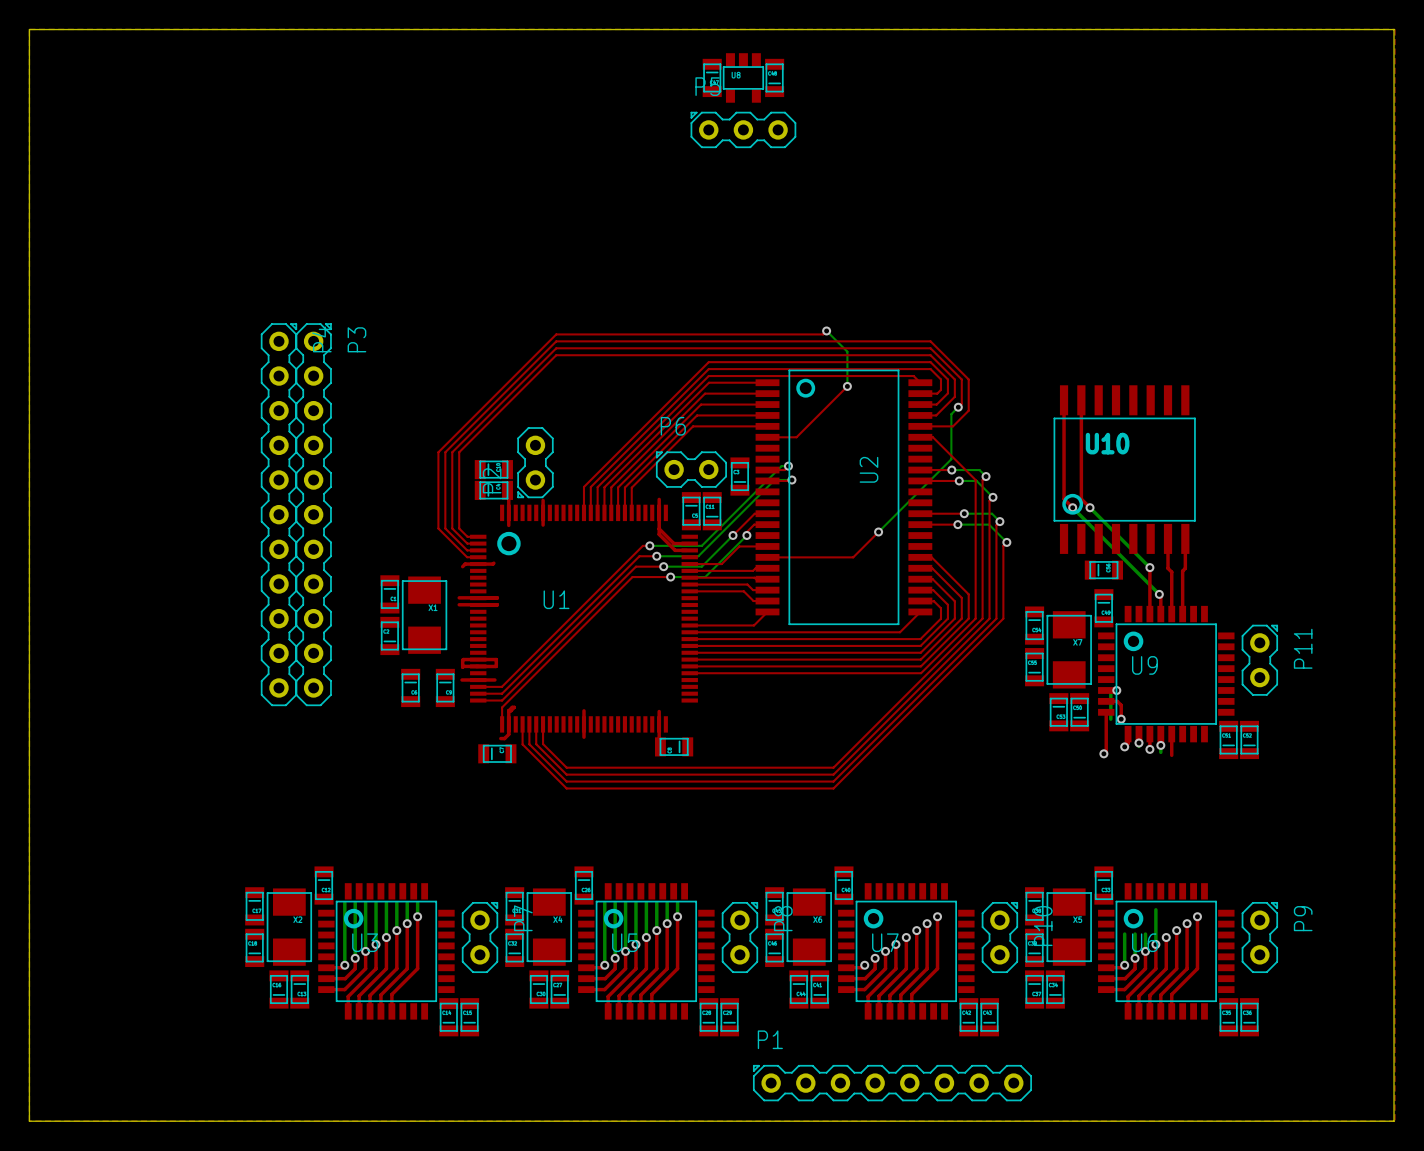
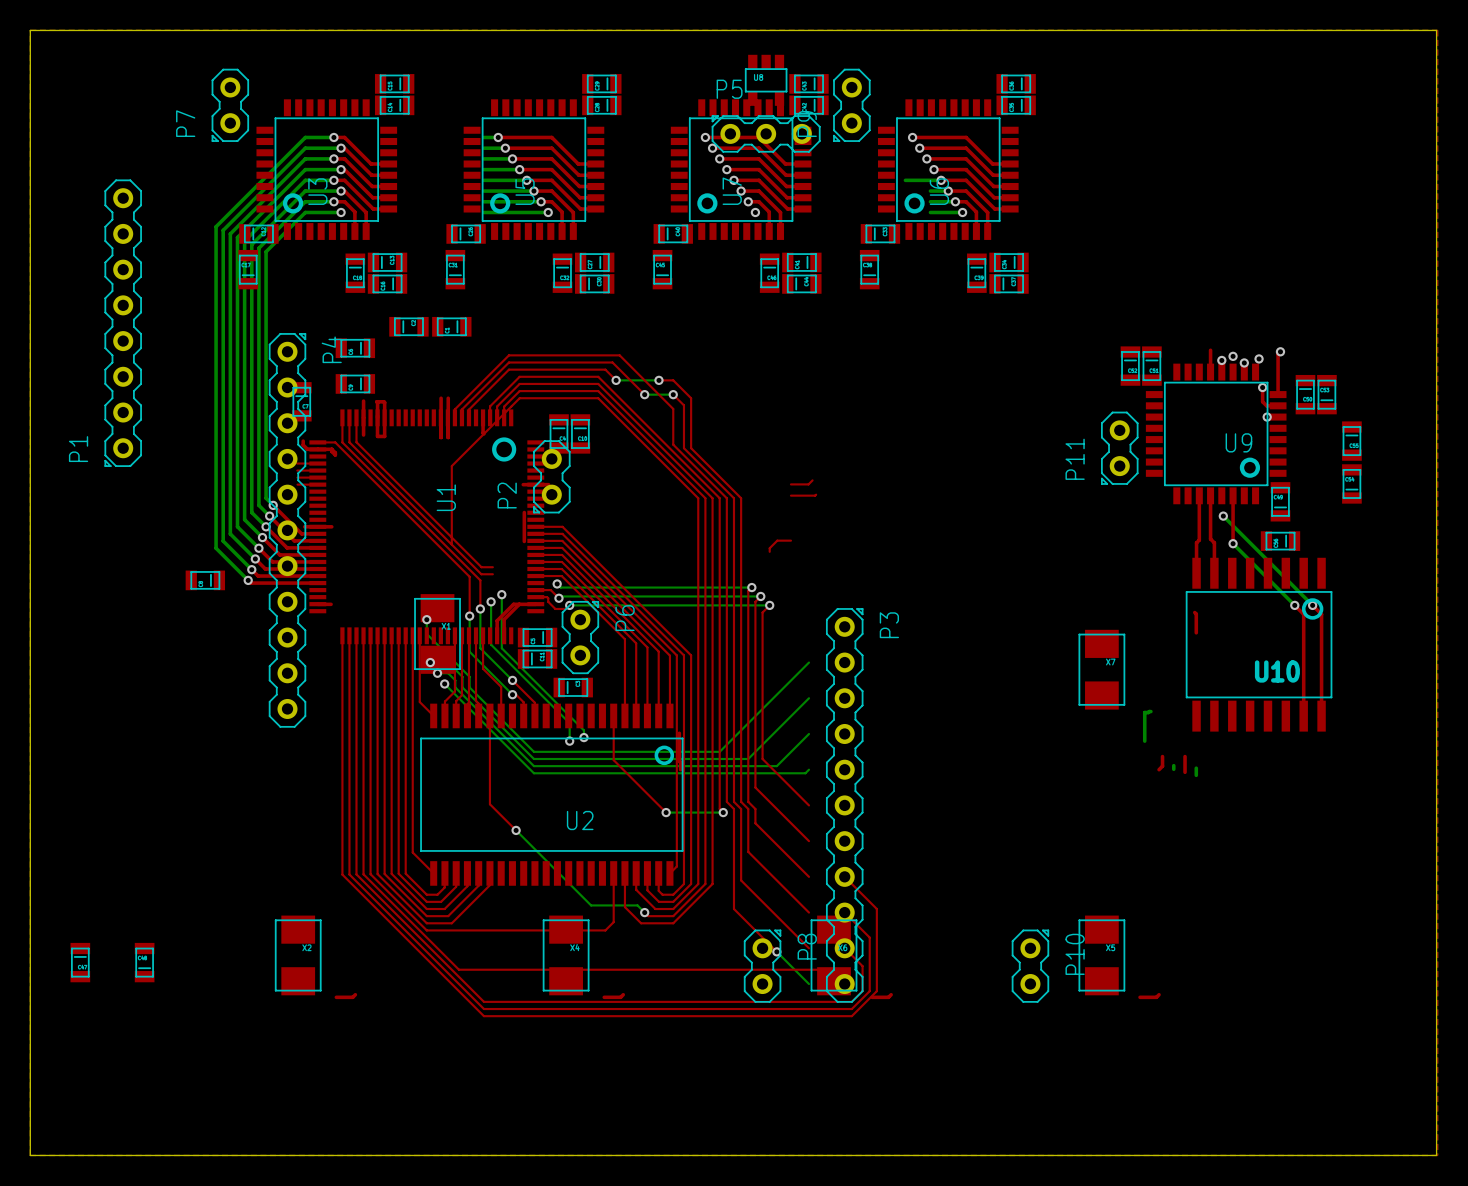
part position: (712, 77) -> (80, 962)
part position: (774, 77) -> (144, 962)
top track: none -> (333, 137) (344, 137) (371, 164) (388, 164)
bottom track: none -> (333, 137) (305, 137) (216, 226) (216, 548) (248, 580)
via: none -> (333, 137)
bottom track: none -> (483, 137) (498, 137)
top track: none -> (498, 137) (551, 137) (578, 164) (595, 164)
via: none -> (498, 137)
top track: none -> (705, 137) (758, 137) (785, 164) (803, 164)
via: none -> (705, 137)
top track: none -> (912, 137) (966, 137) (992, 164) (1010, 164)
via: none -> (912, 137)
top track: none -> (341, 148) (344, 148) (371, 175) (388, 175)
bottom track: none -> (341, 148) (305, 148) (223, 230) (223, 541) (251, 569)
via: none -> (341, 148)
bottom track: none -> (483, 148) (505, 148)
top track: none -> (505, 148) (551, 148) (578, 175) (595, 175)
via: none -> (505, 148)
top track: none -> (712, 148) (758, 148) (786, 175) (803, 175)
via: none -> (712, 148)
top track: none -> (919, 148) (966, 148) (993, 175) (1010, 175)
via: none -> (919, 148)
top track: none -> (333, 158) (344, 158) (372, 186) (388, 186)
bottom track: none -> (333, 158) (305, 158) (230, 233) (230, 533) (255, 558)
via: none -> (333, 158)
bottom track: none -> (483, 158) (512, 158)
top track: none -> (512, 158) (551, 158) (579, 186) (595, 186)
via: none -> (512, 158)
top track: none -> (719, 158) (758, 158) (786, 186) (803, 186)
via: none -> (719, 158)
top track: none -> (926, 158) (966, 158) (993, 186) (1010, 186)
via: none -> (926, 158)
top track: none -> (341, 169) (344, 169) (372, 197) (388, 197)
bottom track: none -> (341, 169) (305, 169) (237, 237) (237, 526) (258, 548)
via: none -> (341, 169)
bottom track: none -> (483, 169) (519, 169)
top track: none -> (519, 169) (551, 169) (579, 197) (595, 197)
via: none -> (519, 169)
top track: none -> (726, 169) (758, 169) (787, 197) (803, 197)
via: none -> (726, 169)
top track: none -> (934, 169) (966, 169) (994, 197) (1010, 197)
via: none -> (934, 169)
top track: none -> (333, 180) (344, 180) (373, 209) (388, 209)
bottom track: none -> (333, 180) (305, 180) (244, 241) (244, 519) (262, 537)
via: none -> (333, 180)
bottom track: none -> (483, 180) (526, 180)
top track: none -> (526, 180) (551, 180) (580, 209) (595, 209)
via: none -> (526, 180)
top track: none -> (733, 180) (758, 180) (787, 209) (803, 209)
via: none -> (733, 180)
bottom track: none -> (905, 180) (941, 180)
top track: none -> (941, 180) (966, 180) (994, 209) (1010, 209)
via: none -> (941, 180)
top track: none -> (341, 191) (344, 191) (366, 212) (366, 231)
bottom track: none -> (341, 191) (305, 191) (251, 244) (251, 512) (266, 526)
via: none -> (341, 191)
bottom track: none -> (483, 191) (533, 191)
top track: none -> (533, 191) (551, 191) (573, 212) (573, 231)
via: none -> (533, 191)
top track: none -> (741, 191) (758, 191) (780, 212) (780, 231)
via: none -> (741, 191)
bottom track: none -> (930, 191) (948, 191)
top track: none -> (948, 191) (966, 191) (987, 212) (987, 231)
via: none -> (948, 191)
top track: none -> (333, 201) (344, 201) (354, 212) (354, 231)
bottom track: none -> (333, 201) (305, 201) (258, 248) (258, 505) (269, 516)
via: none -> (333, 201)
bottom track: none -> (483, 201) (541, 201)
top track: none -> (541, 201) (551, 201) (562, 212) (562, 231)
via: none -> (541, 201)
top track: none -> (748, 201) (758, 201) (769, 212) (769, 231)
via: none -> (748, 201)
bottom track: none -> (930, 201) (955, 201)
top track: none -> (955, 201) (966, 201) (976, 212) (976, 231)
via: none -> (955, 201)
bottom track: none -> (341, 212) (305, 212) (266, 251) (266, 498) (273, 505)
via: none -> (341, 212)
bottom track: none -> (483, 212) (548, 212)
via: none -> (548, 212)
via: none -> (755, 212)
bottom track: none -> (930, 212) (962, 212)
via: none -> (962, 212)
top track: (826, 330) (823, 334) (556, 334) (504, 386) -> (636, 873) (636, 889) (655, 909) (673, 909) (698, 884) (698, 498) (598, 398) (519, 398)
bottom track: (826, 330) (847, 351) (847, 386) -> none
via: (826, 330) -> none
top track: none -> (1210, 350) (1210, 372)
top track: none -> (1280, 351) (1278, 354) (1278, 394)
via: none -> (1280, 351)
via: none -> (1233, 356)
via: none -> (1259, 358)
via: none -> (1221, 360)
via: none -> (1244, 362)
top track: none -> (616, 380) (605, 369) (508, 369) (468, 409) (468, 417)
bottom track: none -> (616, 380) (658, 380)
via: none -> (616, 380)
top track: none -> (658, 380) (673, 380) (691, 398) (691, 448) (741, 498) (741, 801) (748, 808) (748, 851) (808, 912)
via: none -> (658, 380)
top track: none -> (1262, 387) (1262, 401) (1266, 405) (1278, 405)
via: none -> (1262, 387)
top track: none -> (644, 394) (612, 362) (508, 362) (461, 409) (461, 417)
bottom track: none -> (644, 394) (673, 394)
via: none -> (644, 394)
top track: none -> (673, 394) (683, 405) (683, 448) (733, 498) (733, 801) (741, 808) (741, 880) (808, 948)
via: none -> (673, 394)
top track: (767, 382) (709, 382) (604, 487) (604, 512) -> none
top track: (920, 382) (913, 376) (708, 376) (597, 487) (597, 512) -> none
top track: none -> (441, 398) (441, 437) (440, 417)
top track: none -> (448, 398) (448, 437) (447, 417)
top track: (847, 386) (796, 437) (767, 437) -> none
via: (847, 386) -> none
top track: none -> (363, 401) (363, 435)
top track: none -> (376, 401) (377, 436) (384, 436) (384, 402) (376, 401)
top track: (767, 393) (705, 393) (611, 487) (611, 512) -> none
top track: (920, 393) (937, 393) (940, 389) (940, 379) (930, 369) (708, 369) (590, 487) (590, 512) -> none
top track: (1064, 400) (1064, 499) (1072, 507) -> none
top track: (1081, 400) (1081, 499) (1090, 507) -> none
top track: (767, 404) (701, 404) (618, 487) (618, 512) -> none
top track: (920, 404) (936, 404) (947, 393) (947, 379) (930, 362) (708, 362) (583, 486) (583, 512) -> none
via: none -> (1267, 417)
top track: none -> (342, 417) (342, 442) (480, 580) (480, 608)
top track: none -> (349, 417) (349, 442) (451, 544)
top track: none -> (454, 417) (454, 409) (508, 355) (619, 355) (673, 408) (673, 444) (726, 498) (726, 801) (733, 808) (733, 909) (776, 951)
top track: none -> (483, 417) (483, 433)
top track: none -> (490, 417) (490, 406) (519, 376) (598, 376) (719, 498) (719, 808) (723, 812)
top track: none -> (497, 417) (497, 406) (519, 383) (598, 383) (712, 498) (712, 884) (673, 923) (641, 923) (624, 907) (624, 873)
top track: none -> (504, 417) (504, 406) (519, 391) (598, 391) (705, 498) (705, 884) (673, 916) (648, 916) (644, 912)
top track: (958, 407) (961, 403) (961, 379) (930, 348) (556, 348) (452, 452) (452, 528) (467, 543) (478, 543) -> none
bottom track: (958, 407) (951, 414) (951, 459) (878, 532) -> none
via: (958, 407) -> none
top track: (767, 415) (697, 415) (624, 487) (624, 512) -> none
top track: (920, 415) (936, 415) (954, 396) (954, 379) (930, 355) (556, 355) (459, 452) (459, 528) (467, 536) (478, 536) -> none
top track: (767, 426) (693, 426) (631, 487) (631, 512) -> none
top track: (920, 426) (953, 426) (968, 410) (968, 379) (930, 341) (556, 341) (445, 452) (445, 528) -> (356, 417) (356, 442) (458, 544)
top track: none -> (303, 441) (303, 445) (307, 449) (331, 449)
top track: none -> (317, 442) (335, 442) (469, 576) (469, 616)
top track: none -> (331, 449) (335, 452) (335, 455) (331, 451) (331, 449)
top track: (920, 437) (932, 437) (975, 480) (975, 618) (921, 673) (689, 673) -> none
top track: none -> (297, 463) (317, 463)
top track: none -> (297, 470) (317, 470)
top track: none -> (297, 477) (317, 477)
bottom track: (788, 466) (781, 466) (701, 545) (649, 545) -> none
via: (788, 466) -> none
part rotation: 0° (493, 469) -> 90° clockwise (580, 433)
part position: (493, 469) -> (580, 433)
P6 rotation: 0° (691, 469) -> 90° clockwise (580, 637)
P6 position: (691, 469) -> (580, 637)
U10 rotation: 0° (1124, 469) -> 180° (1259, 644)
U10 position: (1124, 469) -> (1259, 644)
top track: none -> (297, 484) (317, 484)
top track: none -> (523, 484) (548, 484)
top track: (920, 470) (951, 470) -> none
bottom track: (951, 470) (979, 470) (986, 476) -> none
via: (951, 470) -> none
part rotation: 0° (739, 476) -> 90° clockwise (573, 687)
part position: (739, 476) -> (573, 687)
top track: (986, 476) (982, 480) (982, 618) (833, 767) (566, 767) (543, 744) (543, 724) -> none
via: (986, 476) -> none
bottom track: (791, 480) (774, 480) (698, 556) (656, 556) -> none
via: (791, 480) -> none
top track: (920, 480) (959, 480) -> none
bottom track: (959, 480) (976, 480) (992, 497) -> none
via: (959, 480) -> none
top track: none -> (1199, 495) (1199, 540) (1196, 542) (1196, 573)
top track: none -> (1210, 495) (1210, 539) (1214, 542) (1214, 573)
top track: none -> (273, 505) (301, 533) (317, 533)
via: none -> (273, 505)
part rotation: 0° (493, 490) -> 90° clockwise (558, 433)
part position: (493, 490) -> (558, 433)
U2 rotation: 0° (843, 497) -> 90° clockwise (551, 794)
U2 position: (843, 497) -> (551, 794)
top track: (992, 497) (989, 500) (989, 618) (833, 774) (566, 774) (536, 744) (536, 724) -> none
via: (992, 497) -> none
top track: (659, 499) (659, 534) (675, 550) (686, 550) -> none
top track: none -> (269, 516) (294, 540) (317, 540)
via: none -> (269, 516)
top track: (543, 500) (543, 525) -> none
via: none -> (1223, 516)
bottom track: (1072, 507) (1159, 594) -> (1223, 516) (1312, 605)
via: (1072, 507) -> none
bottom track: (1090, 507) (1149, 567) -> (1233, 543) (1294, 605)
via: (1090, 507) -> none
top track: none -> (266, 526) (287, 547) (317, 547)
via: none -> (266, 526)
top track: none -> (304, 526) (331, 526)
top track: none -> (535, 526) (562, 526) (691, 655) (691, 884) (673, 901) (658, 901) (647, 890) (647, 873)
part rotation: 0° (691, 511) -> 90° clockwise (537, 637)
part position: (691, 511) -> (537, 637)
part rotation: 0° (712, 511) -> 90° clockwise (537, 658)
part position: (712, 511) -> (537, 658)
top track: (767, 513) (754, 513) (733, 535) -> none
top track: (920, 513) (964, 513) -> none
bottom track: (964, 513) (992, 513) (999, 521) -> none
via: (964, 513) -> none
P3 position: (313, 514) -> (844, 805)
top track: none -> (535, 533) (562, 533) (683, 655) (683, 884) (673, 894) (662, 894) (658, 890) (658, 873)
top track: none -> (262, 537) (279, 554) (317, 554)
via: none -> (262, 537)
top track: (999, 521) (996, 525) (996, 618) (833, 781) (566, 781) (529, 744) (529, 724) -> none
via: (999, 521) -> none
top track: none -> (535, 540) (562, 540) (676, 655) (676, 866) (669, 873)
top track: (920, 524) (957, 524) -> none
bottom track: (957, 524) (989, 524) (1006, 542) -> none
via: (957, 524) -> none
via: none -> (1233, 543)
top track: (659, 528) (673, 543) (689, 543) -> none
top track: none -> (535, 547) (562, 547) (669, 655) (669, 715)
top track: none -> (258, 548) (272, 561) (317, 561)
via: none -> (258, 548)
top track: (878, 532) (853, 557) (767, 557) -> none
via: (878, 532) -> none
bottom track: (733, 535) (701, 566) (663, 566) -> none
via: (733, 535) -> none
bottom track: (746, 535) (705, 577) (670, 577) -> none
via: (746, 535) -> none
top track: none -> (535, 554) (562, 554) (658, 651) (658, 715)
top track: (1168, 538) (1168, 568) (1171, 572) (1171, 614) -> none
top track: (1185, 538) (1185, 568) (1182, 571) (1182, 614) -> none
top track: none -> (255, 558) (265, 569) (317, 569)
via: none -> (255, 558)
top track: (1006, 542) (1003, 545) (1003, 618) (833, 788) (566, 788) (522, 744) (522, 724) -> none
via: (1006, 542) -> none
top track: none -> (535, 561) (561, 561) (647, 647) (647, 715)
top track: (649, 545) (642, 545) (501, 686) (478, 686) -> none
via: (649, 545) -> none
top track: (767, 546) (739, 546) (721, 564) (689, 564) -> none
top track: none -> (251, 569) (258, 576) (317, 576)
via: none -> (251, 569)
top track: none -> (535, 569) (561, 569) (636, 643) (636, 715)
top track: (656, 556) (639, 556) (502, 693) (478, 693) -> none
via: (656, 556) -> none
top track: (920, 557) (931, 557) (968, 594) (968, 618) (920, 666) (689, 666) -> none
top track: none -> (535, 576) (561, 576) (624, 639) (624, 715)
top track: none -> (248, 580) (250, 583) (317, 583)
via: none -> (248, 580)
top track: (493, 563) (465, 564) (462, 566) -> none
bottom track: none -> (557, 583) (560, 587) (751, 587)
via: none -> (557, 583)
top track: (663, 566) (635, 566) (502, 700) (478, 700) -> none
via: (663, 566) -> none
top track: (1149, 567) (1149, 614) -> (1233, 495) (1233, 543)
via: (1149, 567) -> none
top track: (767, 568) (755, 568) (753, 570) (689, 570) -> none
top track: (920, 568) (932, 568) (961, 597) (961, 618) (920, 659) (689, 659) -> none
top track: none -> (751, 587) (748, 591) (748, 801) (755, 808) (755, 823) (808, 876)
via: none -> (751, 587)
part rotation: 0° (1103, 570) -> 180° (1280, 541)
part position: (1103, 570) -> (1280, 541)
top track: none -> (535, 590) (550, 590) (558, 598)
bottom track: none -> (501, 594) (501, 648) (583, 730) (583, 737)
via: none -> (501, 594)
top track: (670, 577) (632, 577) (502, 707) (502, 724) -> none
via: (670, 577) -> none
top track: (689, 577) (754, 577) (757, 580) (767, 579) -> none
top track: none -> (760, 596) (755, 601) (755, 787) (808, 841)
bottom track: none -> (760, 596) (560, 596) (558, 598)
via: none -> (760, 596)
top track: none -> (535, 597) (547, 597) (548, 601) (555, 608) (566, 608) (569, 605)
top track: (920, 579) (932, 579) (954, 601) (954, 618) (920, 652) (689, 652) -> none
via: none -> (558, 598)
bottom track: none -> (491, 601) (491, 644) (569, 723) (569, 741)
via: none -> (491, 601)
top track: (689, 584) (747, 584) (753, 590) (767, 590) -> none
top track: none -> (317, 604) (331, 604)
top track: none -> (519, 604) (504, 619) (504, 635)
top track: none -> (535, 604) (513, 604) (497, 620) (497, 632)
bottom track: none -> (569, 605) (769, 605)
via: none -> (569, 605)
top track: none -> (769, 605) (762, 612) (762, 758) (808, 805)
via: none -> (769, 605)
top track: none -> (1294, 605) (1303, 614) (1303, 716)
via: none -> (1294, 605)
top track: none -> (1312, 605) (1321, 614) (1321, 716)
via: none -> (1312, 605)
bottom track: none -> (480, 608) (480, 648) (512, 680)
via: none -> (480, 608)
top track: (920, 590) (933, 590) (947, 604) (947, 618) (920, 645) (689, 645) -> none
top track: (689, 591) (743, 591) (753, 601) (767, 601) -> none
part rotation: 0° (389, 594) -> 90° clockwise (451, 326)
part position: (389, 594) -> (451, 326)
via: (1159, 594) -> none
bottom track: none -> (469, 616) (469, 651) (512, 694)
via: none -> (469, 616)
top track: (459, 597) (497, 597) (478, 598) -> none
bottom track: none -> (426, 619) (426, 633) (469, 676) (469, 687) (533, 751) (719, 751) (808, 662)
via: none -> (426, 619)
top track: (920, 601) (934, 601) (940, 608) (940, 618) (920, 639) (689, 639) -> none
top track: (459, 604) (497, 604) (478, 605) -> none
part rotation: 0° (1103, 608) -> 180° (1280, 501)
part position: (1103, 608) -> (1280, 501)
top track: (767, 611) (754, 625) (689, 625) -> none
top track: (920, 611) (900, 632) (689, 632) -> none
top track: none -> (342, 635) (342, 874) (483, 1016) (851, 1016) (876, 991) (876, 909) (844, 876)
top track: none -> (349, 635) (349, 874) (483, 1009) (851, 1009) (869, 991) (869, 937) (844, 912)
top track: none -> (356, 635) (356, 874) (483, 1001) (851, 1001) (862, 991) (862, 966) (844, 948)
top track: none -> (363, 635) (363, 874) (458, 969) (830, 969) (844, 984)
top track: none -> (370, 635) (370, 874) (426, 930) (605, 930) (613, 922) (613, 873)
top track: none -> (377, 635) (377, 874) (426, 923) (451, 923) (489, 885) (489, 873)
top track: none -> (384, 635) (384, 873) (426, 916) (448, 916) (478, 885) (478, 873)
top track: none -> (391, 635) (391, 873) (426, 909) (444, 909) (467, 886) (467, 873)
top track: none -> (398, 635) (398, 873) (426, 901) (441, 901) (456, 886) (456, 873)
top track: none -> (405, 635) (405, 873) (426, 894) (437, 894) (444, 887) (444, 873)
top track: none -> (412, 635) (412, 852) (433, 873)
top track: none -> (419, 635) (419, 702) (433, 715)
top track: none -> (454, 635) (454, 691) (444, 701) (444, 715)
top track: none -> (461, 635) (461, 695) (456, 701) (456, 715)
top track: none -> (468, 635) (468, 702) (466, 705) (467, 715)
top track: none -> (476, 635) (476, 701) (478, 703) (478, 715)
top track: none -> (483, 635) (483, 668) (501, 686) (501, 715)
U1 rotation: 0° (583, 618) -> 90° clockwise (426, 526)
U1 position: (583, 618) -> (426, 526)
part rotation: 0° (1034, 625) -> 180° (1351, 483)
part position: (1034, 625) -> (1351, 483)
part rotation: 0° (389, 635) -> 90° clockwise (408, 326)
part position: (389, 635) -> (408, 326)
bottom track: none -> (430, 662) (448, 662) (462, 676) (462, 687) (533, 758) (748, 758) (808, 698)
via: none -> (430, 662)
bottom track: none -> (437, 673) (448, 673) (455, 680) (455, 687) (533, 766) (776, 766) (808, 733)
via: none -> (437, 673)
top track: none -> (512, 680) (534, 702) (534, 715)
via: none -> (512, 680)
P11 rotation: 0° (1259, 660) -> 180° (1119, 448)
P11 position: (1259, 660) -> (1119, 448)
bottom track: none -> (444, 683) (533, 773) (805, 773) (808, 769)
via: none -> (444, 683)
top track: (478, 666) (463, 666) (462, 667) (462, 660) (496, 659) (495, 666) (476, 666) -> none
part rotation: 0° (1034, 667) -> 180° (1351, 441)
part position: (1034, 667) -> (1351, 441)
top track: none -> (512, 694) (516, 694) (523, 702) (523, 715)
via: none -> (512, 694)
U9 rotation: 0° (1166, 674) -> 180° (1216, 433)
U9 position: (1166, 674) -> (1216, 433)
top track: (461, 679) (494, 679) -> none
part rotation: 0° (410, 687) -> 90° clockwise (355, 348)
part position: (410, 687) -> (355, 348)
part rotation: 0° (445, 687) -> 90° clockwise (355, 383)
part position: (445, 687) -> (355, 383)
via: (1116, 690) -> none
top track: none -> (489, 715) (489, 804) (516, 830)
top track: none -> (613, 715) (613, 760) (666, 812)
top track: (1106, 701) (1117, 701) (1121, 705) (1121, 719) -> none
top track: (508, 710) (508, 734) (504, 738) (500, 738) -> none
top track: (508, 710) (512, 707) (514, 707) (510, 710) (508, 710) -> none
top track: (583, 710) (583, 737) -> none
part rotation: 0° (1058, 712) -> 180° (1326, 394)
part position: (1058, 712) -> (1326, 394)
part rotation: 0° (1079, 712) -> 180° (1305, 394)
part position: (1079, 712) -> (1305, 394)
top track: (1106, 712) (1106, 751) (1103, 753) -> none
via: none -> (583, 737)
via: none -> (569, 741)
via: (1121, 719) -> none
top track: (1171, 734) (1171, 755) -> none
part rotation: 0° (1228, 739) -> 180° (1151, 366)
part position: (1228, 739) -> (1151, 366)
part rotation: 0° (1249, 739) -> 180° (1130, 366)
part position: (1249, 739) -> (1130, 366)
via: (1138, 742) -> none
via: (1160, 745) -> none
part position: (674, 746) -> (205, 580)
via: (1124, 746) -> none
via: (1149, 749) -> none
part rotation: 0° (497, 753) -> 90° clockwise (301, 401)
part position: (497, 753) -> (301, 401)
via: (1103, 753) -> none
bottom track: none -> (666, 812) (723, 812)
via: none -> (666, 812)
via: none -> (723, 812)
bottom track: none -> (516, 830) (591, 905) (637, 905) (644, 912)
via: none -> (516, 830)
part rotation: 0° (324, 885) -> 90° counterclockwise (258, 233)
part position: (324, 885) -> (258, 233)
part rotation: 0° (583, 885) -> 90° counterclockwise (466, 233)
part position: (583, 885) -> (466, 233)
via: none -> (644, 912)
part rotation: 0° (843, 885) -> 90° counterclockwise (673, 233)
part position: (843, 885) -> (673, 233)
part rotation: 0° (1103, 885) -> 90° counterclockwise (880, 233)
part position: (1103, 885) -> (880, 233)
bottom track: (344, 902) (344, 965) -> none
bottom track: (355, 902) (355, 958) -> none
bottom track: (365, 902) (365, 951) -> none
bottom track: (376, 902) (376, 944) -> none
bottom track: (386, 902) (386, 937) -> none
bottom track: (396, 902) (396, 930) -> none
bottom track: (407, 902) (407, 923) -> none
bottom track: (417, 902) (417, 916) -> none
bottom track: (604, 902) (604, 965) -> none
bottom track: (615, 902) (615, 958) -> none
bottom track: (625, 902) (625, 951) -> none
bottom track: (635, 902) (635, 944) -> none
bottom track: (646, 902) (646, 937) -> none
bottom track: (656, 902) (656, 930) -> none
bottom track: (667, 902) (667, 923) -> none
bottom track: (677, 902) (677, 916) -> none
part rotation: 0° (254, 906) -> 180° (248, 269)
part position: (254, 906) -> (248, 269)
part rotation: 0° (514, 906) -> 180° (455, 269)
part position: (514, 906) -> (455, 269)
part rotation: 0° (774, 906) -> 180° (662, 269)
part position: (774, 906) -> (662, 269)
part rotation: 0° (1034, 906) -> 180° (869, 269)
part position: (1034, 906) -> (869, 269)
bottom track: (1155, 909) (1155, 944) -> none
top track: (417, 916) (417, 968) (391, 994) (391, 1011) -> none
via: (417, 916) -> none
top track: (677, 916) (677, 968) (651, 994) (651, 1011) -> none
via: (677, 916) -> none
top track: (937, 916) (937, 968) (911, 994) (911, 1011) -> none
via: (937, 916) -> none
top track: (1197, 916) (1197, 968) (1171, 994) (1171, 1011) -> none
via: (1197, 916) -> none
top track: (407, 923) (407, 968) (380, 994) (380, 1011) -> none
via: (407, 923) -> none
top track: (667, 923) (667, 968) (640, 994) (640, 1011) -> none
via: (667, 923) -> none
bottom track: none -> (776, 951) (808, 984)
via: none -> (776, 951)
top track: (927, 923) (927, 968) (900, 994) (900, 1011) -> none
via: (927, 923) -> none
top track: (1187, 923) (1187, 968) (1160, 994) (1160, 1011) -> none
via: (1187, 923) -> none
top track: (396, 930) (396, 968) (370, 995) (370, 1011) -> none
via: (396, 930) -> none
top track: (656, 930) (656, 968) (630, 995) (630, 1011) -> none
via: (656, 930) -> none
top track: (916, 930) (916, 968) (889, 995) (889, 1011) -> none
via: (916, 930) -> none
top track: (1176, 930) (1176, 968) (1149, 995) (1149, 1011) -> none
via: (1176, 930) -> none
bottom track: (1124, 934) (1124, 965) -> none
bottom track: (1135, 934) (1135, 958) -> none
bottom track: (1145, 934) (1145, 951) -> none
top track: (386, 937) (386, 968) (359, 996) (359, 1011) -> none
via: (386, 937) -> none
P7 rotation: 0° (480, 937) -> 180° (230, 105)
P7 position: (480, 937) -> (230, 105)
top track: (646, 937) (646, 968) (619, 996) (619, 1011) -> none
via: (646, 937) -> none
top track: (906, 937) (906, 968) (879, 996) (879, 1011) -> none
via: (906, 937) -> none
top track: (1166, 937) (1166, 968) (1138, 996) (1138, 1011) -> none
via: (1166, 937) -> none
P9 rotation: 0° (1259, 937) -> 180° (851, 105)
P9 position: (1259, 937) -> (851, 105)
top track: (376, 944) (376, 968) (348, 996) (348, 1011) -> none
via: (376, 944) -> none
top track: (635, 944) (635, 968) (608, 996) (608, 1011) -> none
via: (635, 944) -> none
top track: (895, 944) (895, 968) (868, 996) (868, 1011) -> none
via: (895, 944) -> none
top track: (1155, 944) (1155, 968) (1128, 996) (1128, 1011) -> none
via: (1155, 944) -> none
part rotation: 0° (254, 947) -> 180° (355, 273)
part position: (254, 947) -> (355, 273)
part rotation: 0° (514, 947) -> 180° (562, 273)
part position: (514, 947) -> (562, 273)
part rotation: 0° (774, 947) -> 180° (769, 273)
part position: (774, 947) -> (769, 273)
part rotation: 0° (1034, 947) -> 180° (976, 273)
part position: (1034, 947) -> (976, 273)
top track: (365, 951) (365, 968) (344, 989) (326, 989) -> none
via: (365, 951) -> none
U3 rotation: 0° (386, 951) -> 90° counterclockwise (326, 169)
U3 position: (386, 951) -> (326, 169)
top track: (625, 951) (625, 968) (604, 989) (586, 989) -> none
via: (625, 951) -> none
U5 rotation: 0° (646, 951) -> 90° counterclockwise (533, 169)
U5 position: (646, 951) -> (533, 169)
top track: (885, 951) (885, 968) (864, 989) (846, 989) -> none
via: (885, 951) -> none
U7 rotation: 0° (906, 951) -> 90° counterclockwise (741, 169)
U7 position: (906, 951) -> (741, 169)
top track: (1145, 951) (1145, 968) (1124, 989) (1106, 989) -> none
via: (1145, 951) -> none
U6 rotation: 0° (1166, 951) -> 90° counterclockwise (948, 169)
U6 position: (1166, 951) -> (948, 169)
top track: (355, 958) (355, 968) (345, 978) (326, 978) -> none
via: (355, 958) -> none
top track: (615, 958) (615, 968) (605, 978) (586, 978) -> none
via: (615, 958) -> none
top track: (875, 958) (875, 968) (865, 978) (846, 978) -> none
via: (875, 958) -> none
top track: (1135, 958) (1135, 968) (1125, 978) (1106, 978) -> none
via: (1135, 958) -> none
via: (344, 965) -> none
via: (604, 965) -> none
via: (864, 965) -> none
via: (1124, 965) -> none
part rotation: 0° (278, 989) -> 90° counterclockwise (387, 283)
part position: (278, 989) -> (387, 283)
part rotation: 0° (299, 989) -> 90° counterclockwise (387, 262)
part position: (299, 989) -> (387, 262)
part rotation: 0° (538, 989) -> 90° counterclockwise (594, 283)
part position: (538, 989) -> (594, 283)
part rotation: 0° (559, 989) -> 90° counterclockwise (594, 262)
part position: (559, 989) -> (594, 262)
part rotation: 0° (798, 989) -> 90° counterclockwise (801, 283)
part position: (798, 989) -> (801, 283)
part rotation: 0° (819, 989) -> 90° counterclockwise (801, 262)
part position: (819, 989) -> (801, 262)
part rotation: 0° (1034, 989) -> 90° counterclockwise (1009, 283)
part position: (1034, 989) -> (1009, 283)
part rotation: 0° (1055, 989) -> 90° counterclockwise (1009, 262)
part position: (1055, 989) -> (1009, 262)
part rotation: 0° (448, 1017) -> 90° counterclockwise (394, 105)
part position: (448, 1017) -> (394, 105)
part rotation: 0° (469, 1017) -> 90° counterclockwise (394, 83)
part position: (469, 1017) -> (394, 83)
part rotation: 0° (708, 1017) -> 90° counterclockwise (601, 105)
part position: (708, 1017) -> (601, 105)
part rotation: 0° (729, 1017) -> 90° counterclockwise (601, 83)
part position: (729, 1017) -> (601, 83)
part rotation: 0° (968, 1017) -> 90° counterclockwise (808, 105)
part position: (968, 1017) -> (808, 105)
part rotation: 0° (989, 1017) -> 90° counterclockwise (808, 83)
part position: (989, 1017) -> (808, 83)
part rotation: 0° (1228, 1017) -> 90° counterclockwise (1016, 105)
part position: (1228, 1017) -> (1016, 105)
part rotation: 0° (1249, 1017) -> 90° counterclockwise (1016, 83)
part position: (1249, 1017) -> (1016, 83)
P1 rotation: 0° (892, 1083) -> 90° counterclockwise (123, 323)
P1 position: (892, 1083) -> (123, 323)

